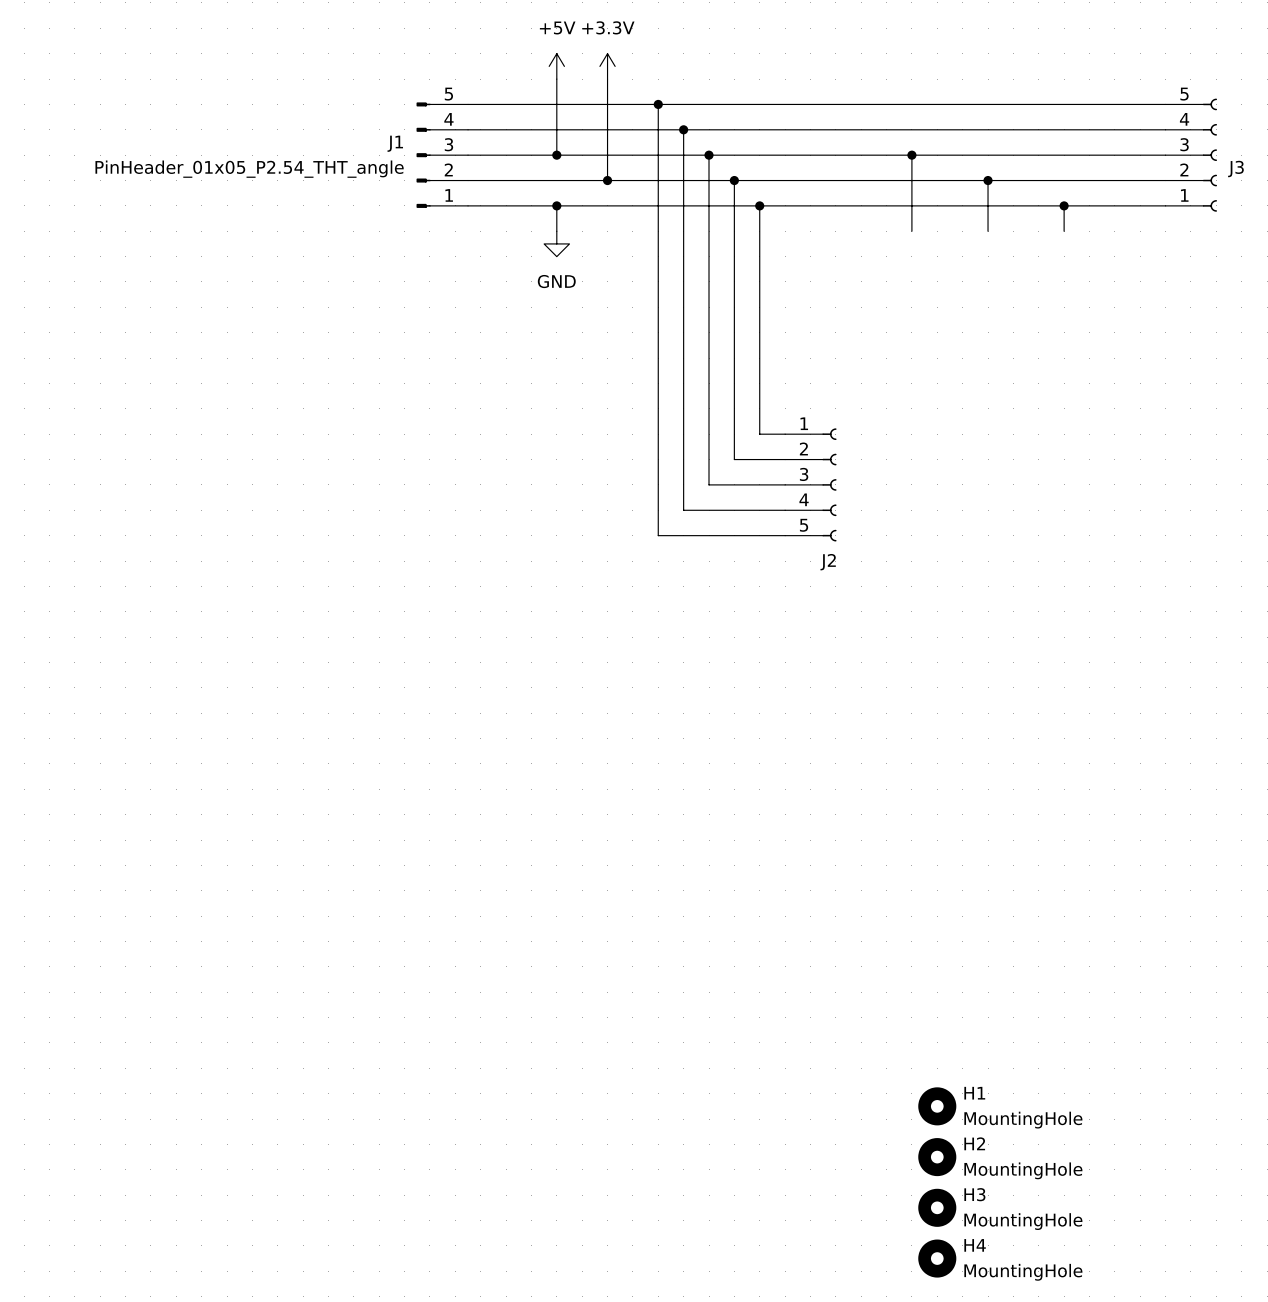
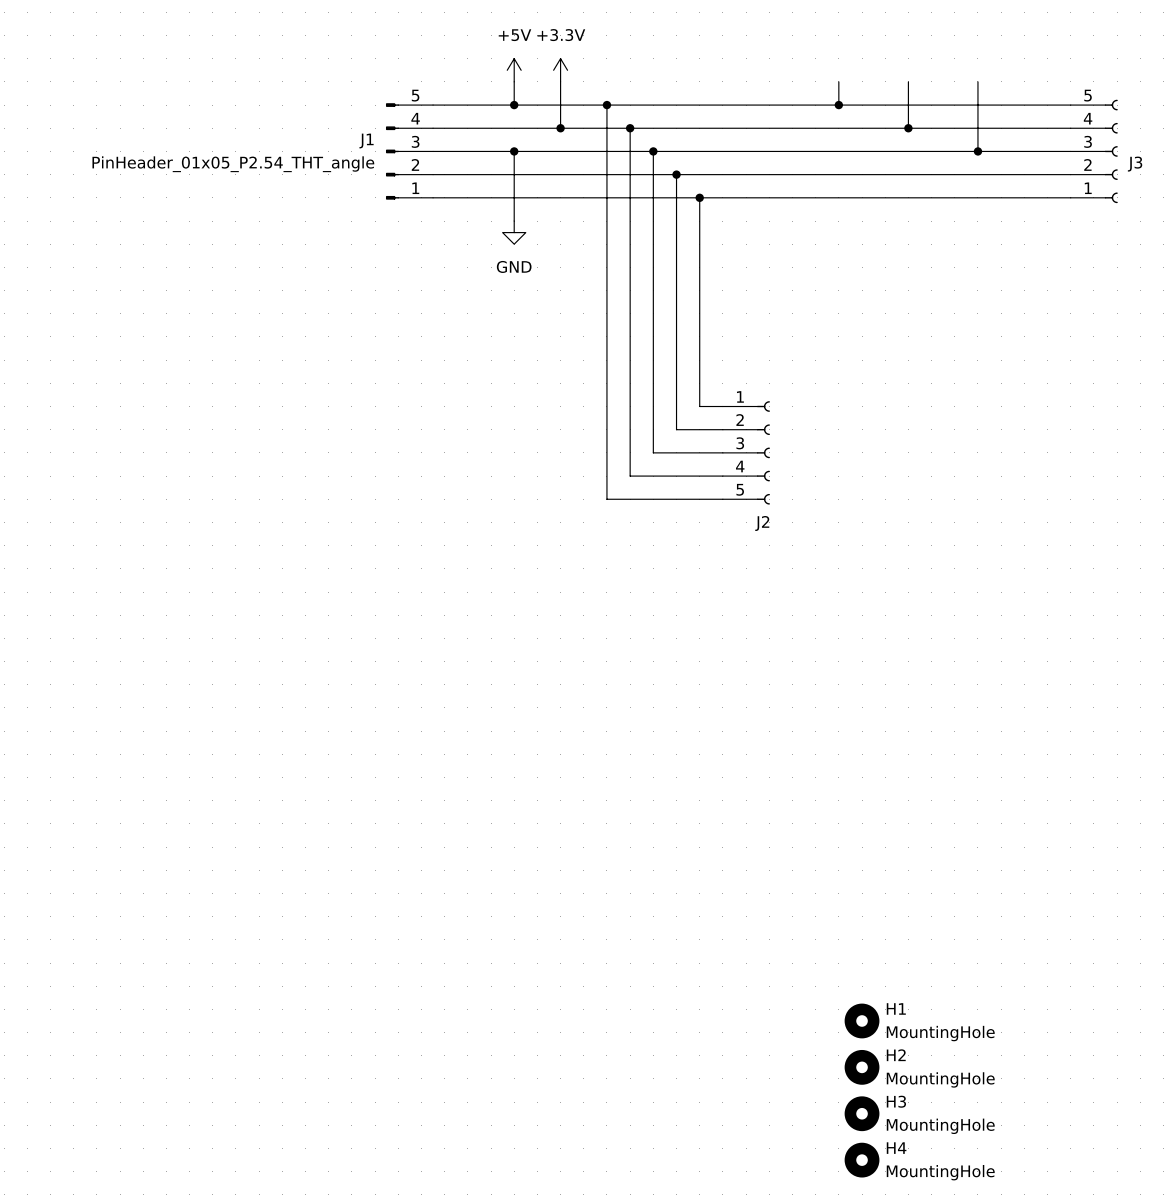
wire: (556, 104) (556, 155) -> (514, 197) (514, 151)
junction: none -> (514, 105)
junction: none -> (838, 105)
wire: (607, 129) (607, 180) -> none
junction: none -> (560, 128)
junction: none -> (908, 128)
wire: (911, 155) (911, 231) -> (977, 81) (977, 151)
junction: (911, 155) -> none
junction: none -> (977, 151)
junction: (607, 180) -> none
wire: (988, 180) (988, 231) -> (908, 81) (908, 128)
junction: (988, 180) -> none
junction: (556, 205) -> none
wire: (1064, 205) (1064, 231) -> (838, 81) (838, 105)
junction: (1064, 205) -> none

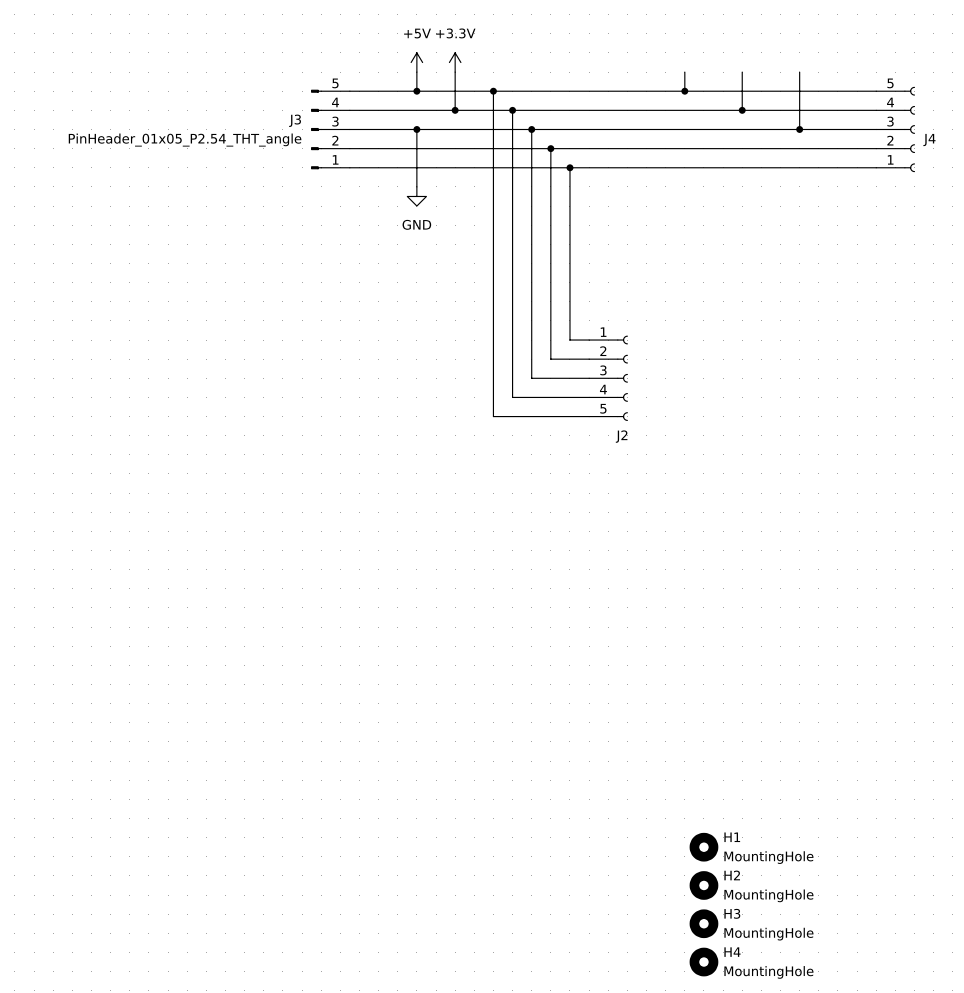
J1 name: J1 (366, 141) -> J3 (295, 120)
J3 name: J3 (1135, 164) -> J4 (929, 140)

